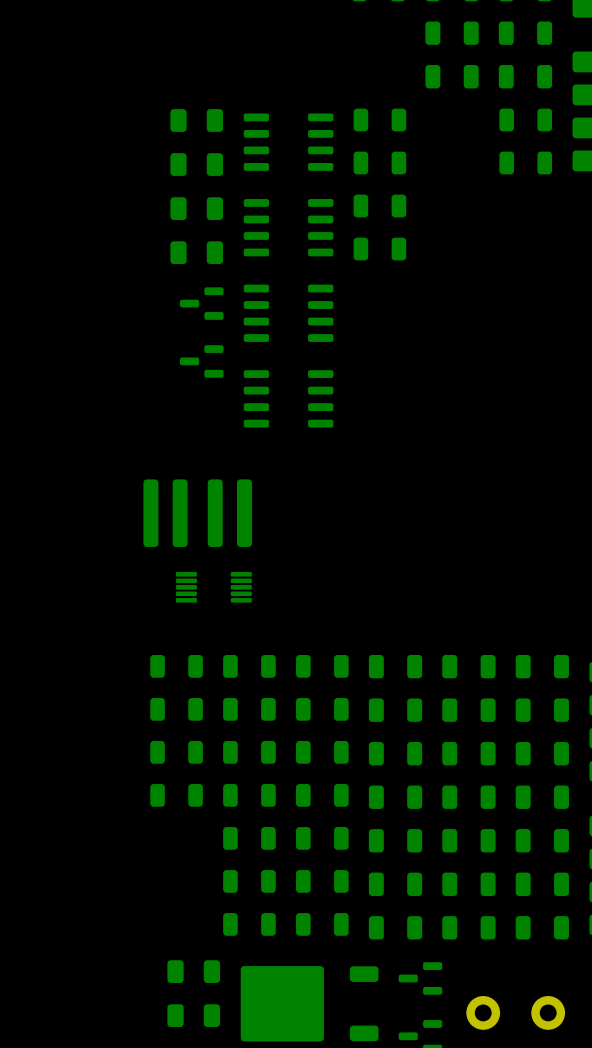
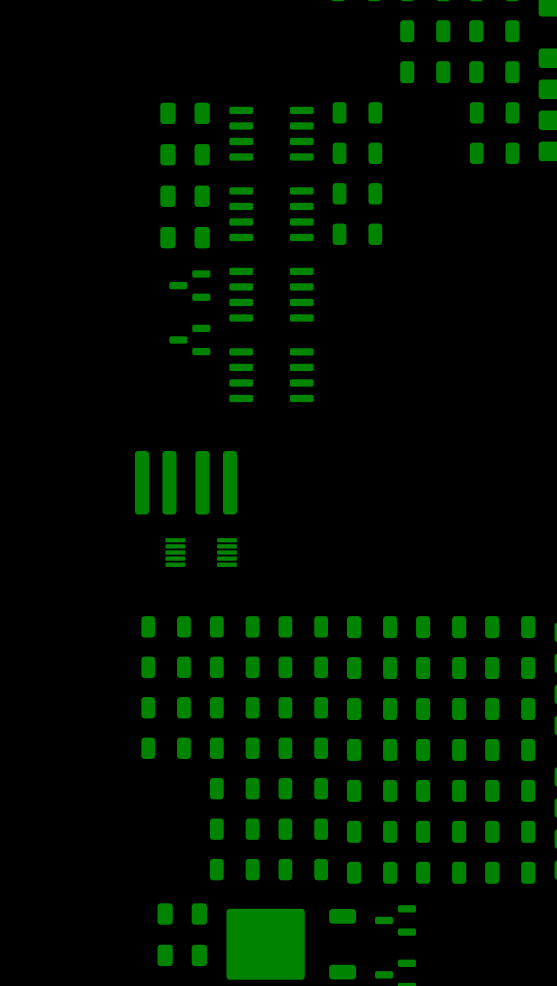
part: (515, 1012) -> none

